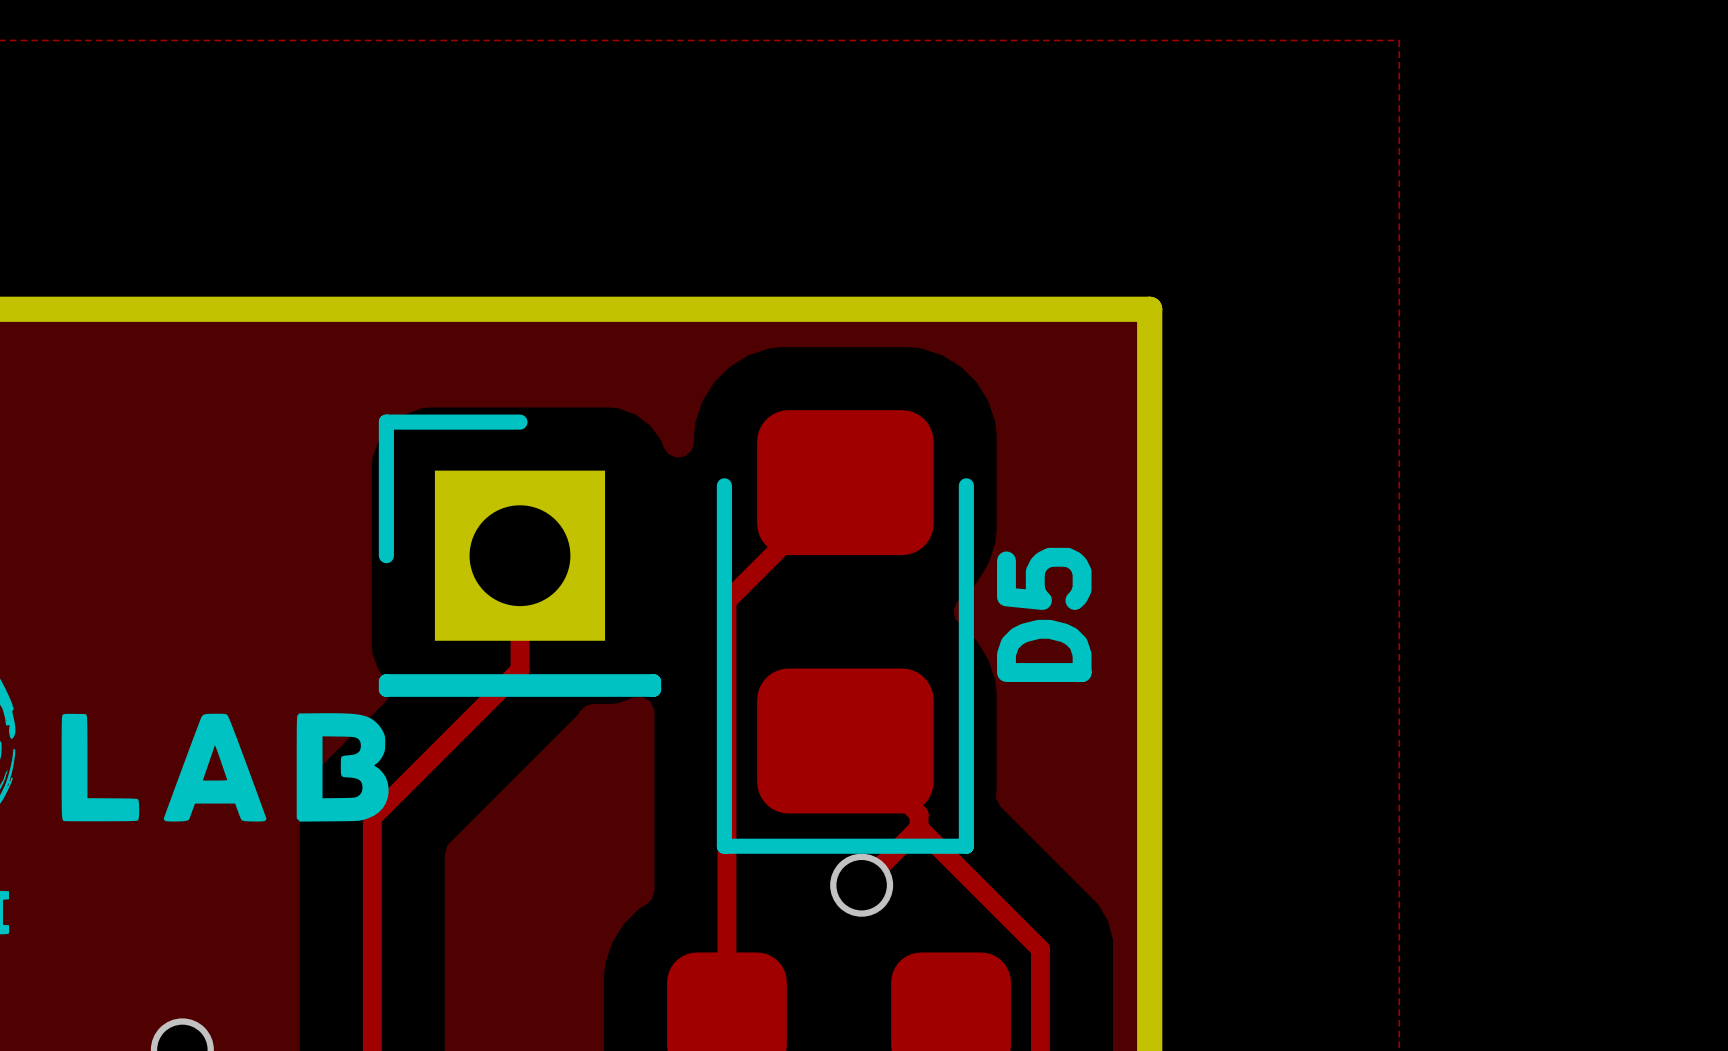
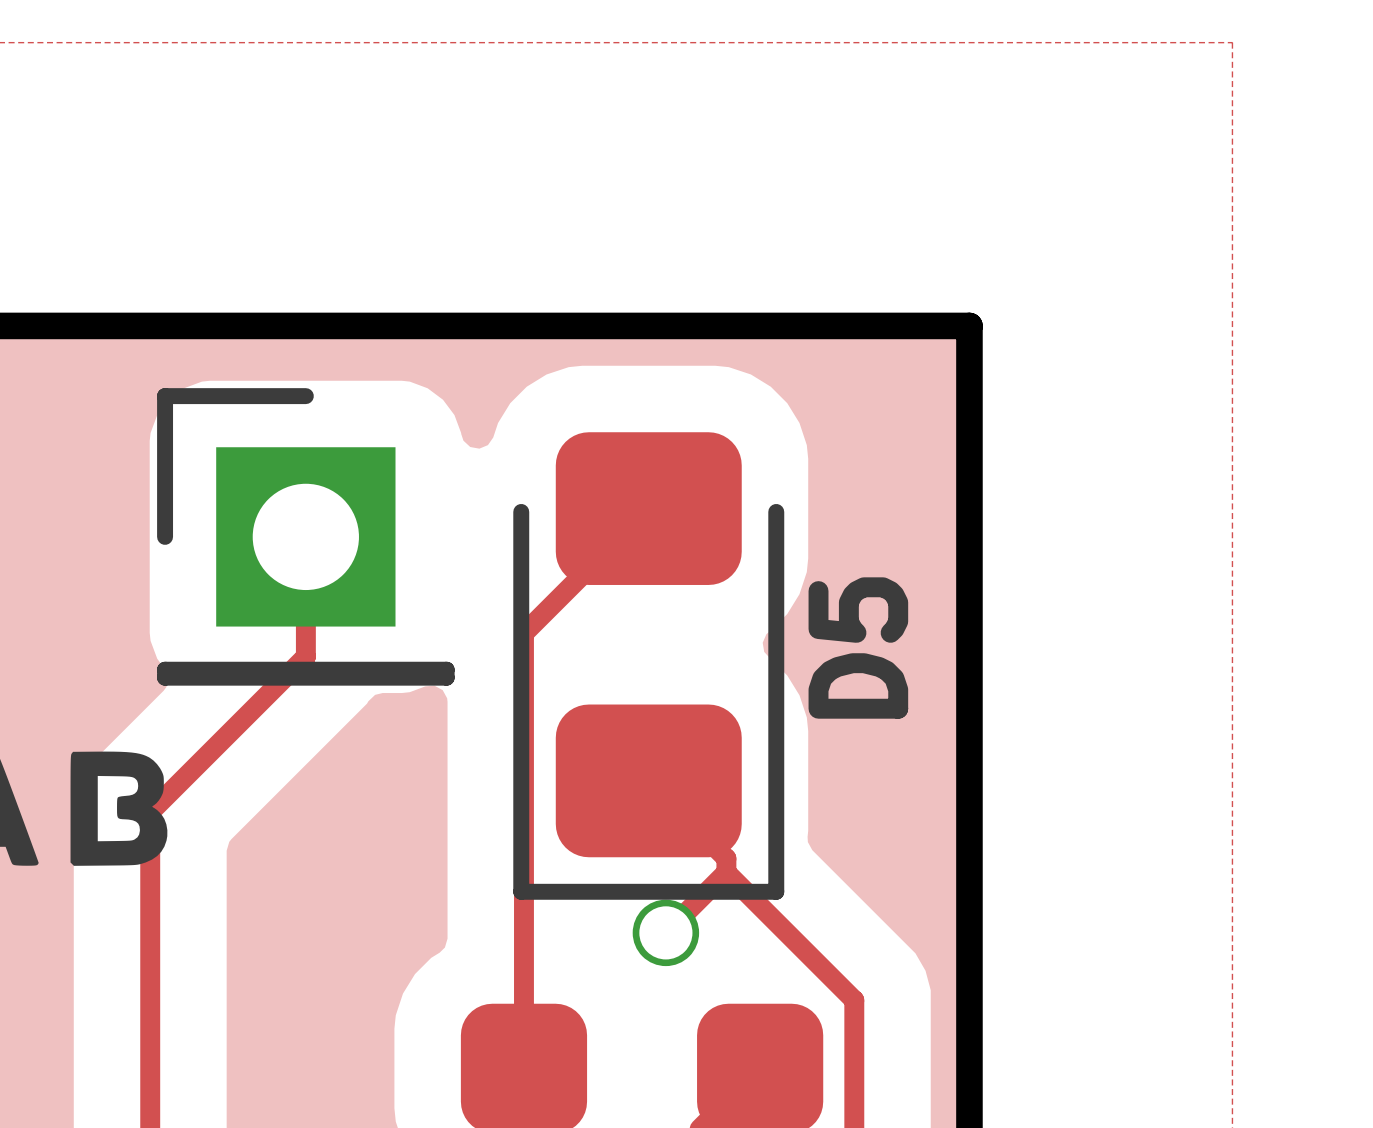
part position: (519, 555) -> (305, 536)
track: (520, 623) (520, 670) (372, 817) -> (305, 656) (150, 812) (150, 861)

